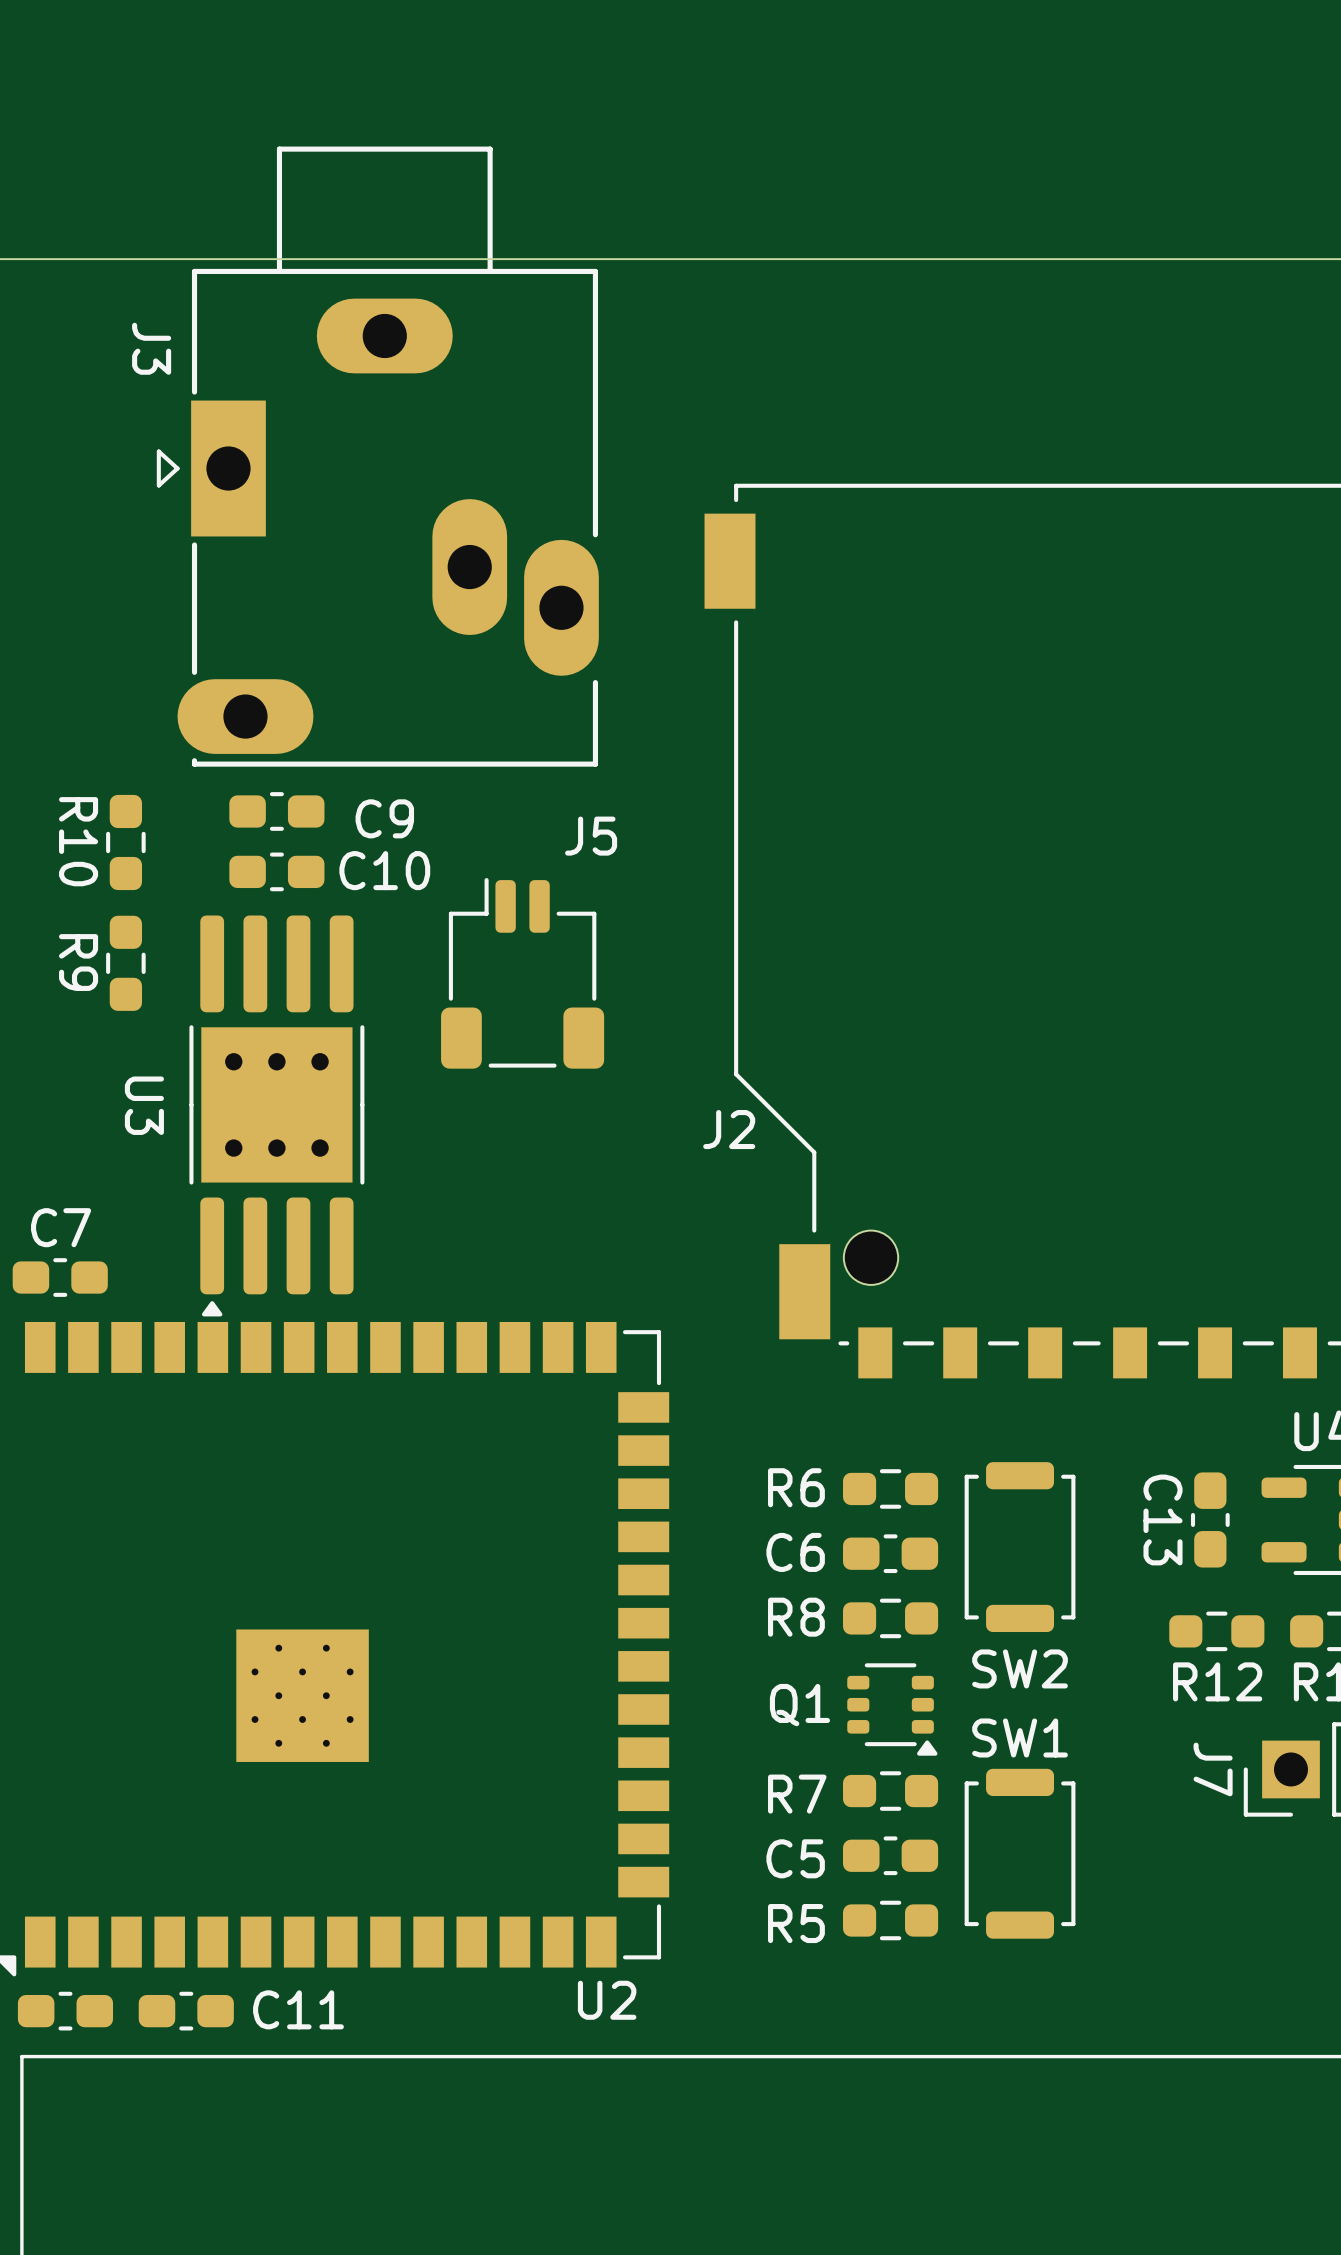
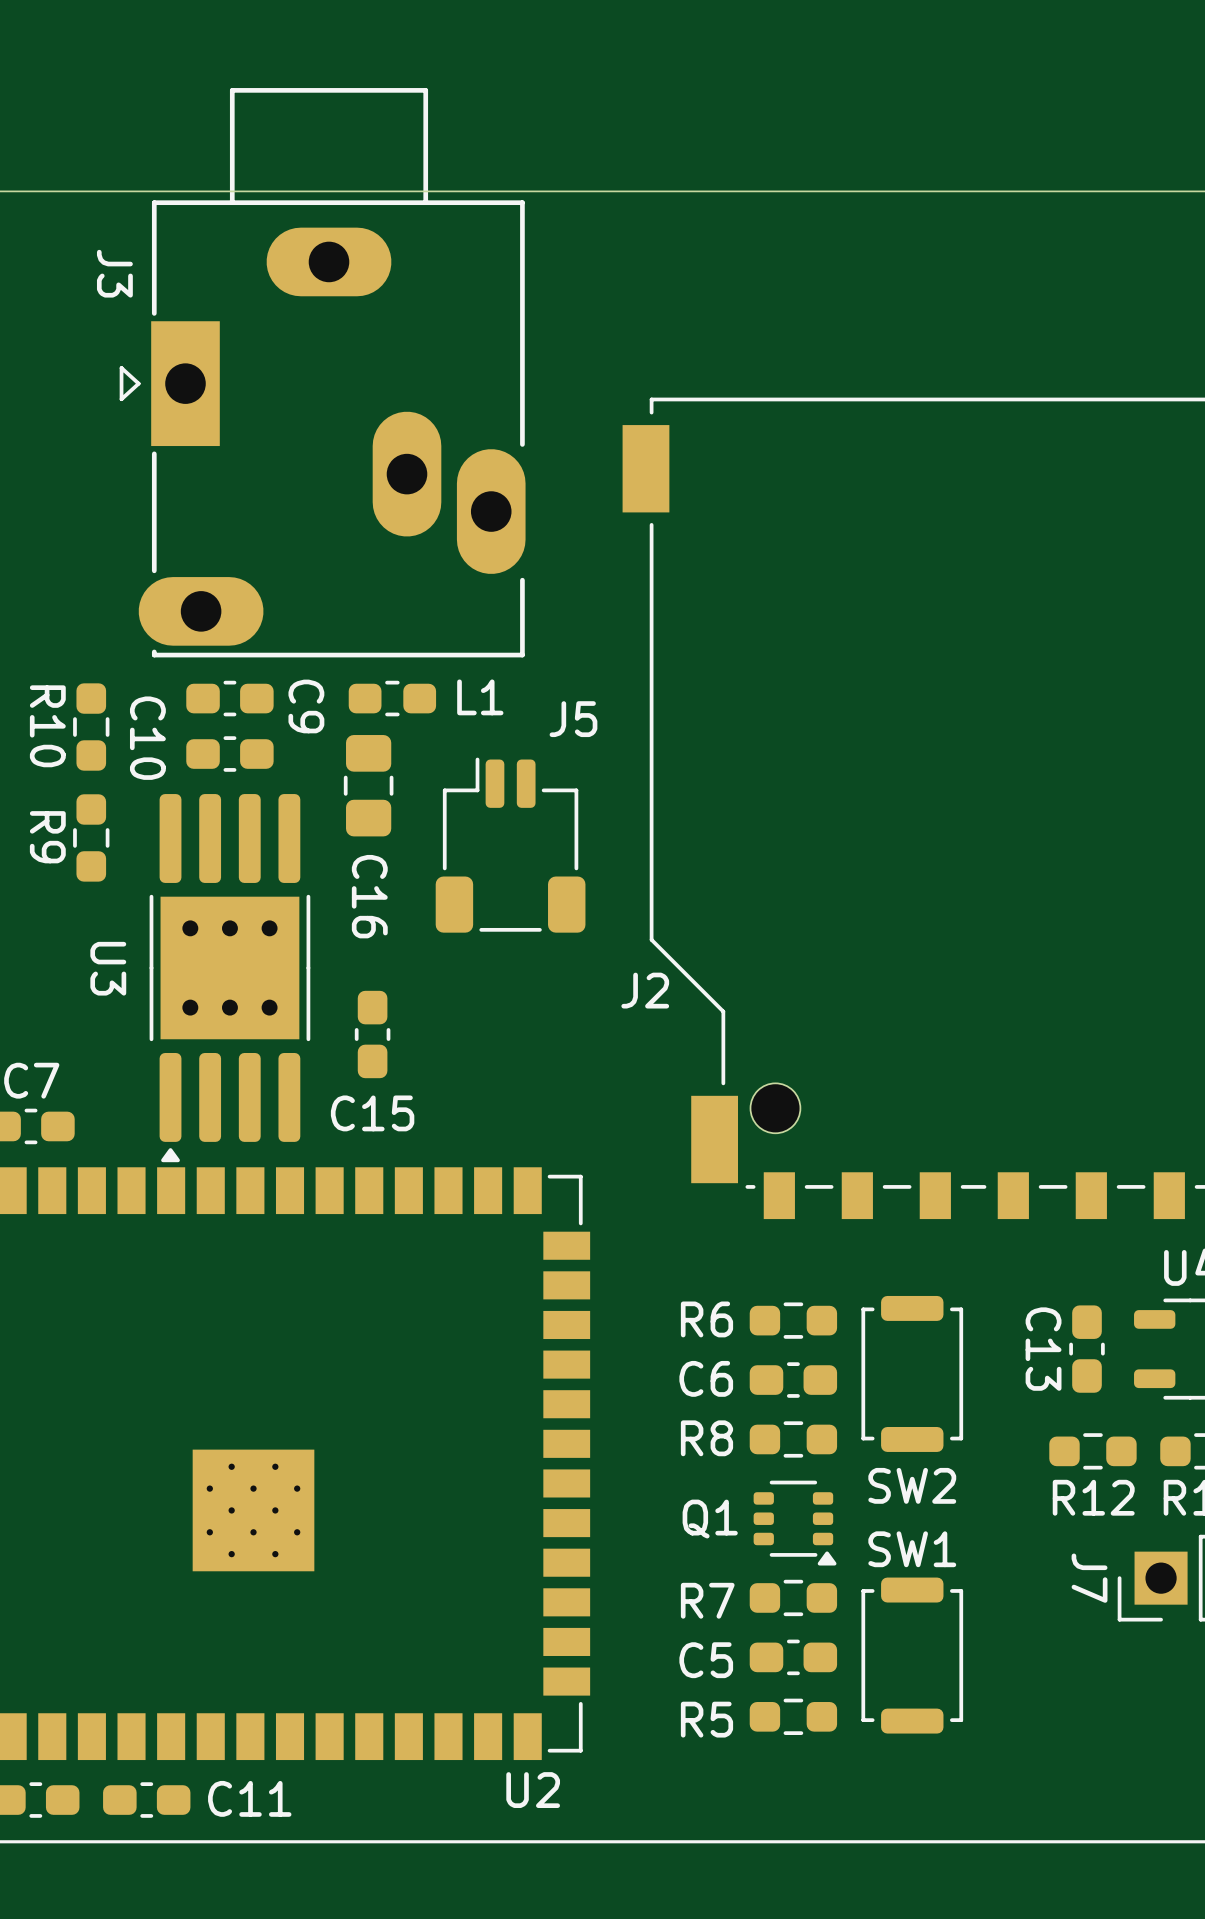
L1: none -> (392, 698)
C9 name rotation: 0° (384, 818) -> 90° clockwise (306, 706)
C10 name rotation: 0° (384, 870) -> 90° clockwise (147, 738)
C10 name position: C10 (384, 870) -> C10 (147, 738)
C16: none -> (368, 785)
J5 position: (522, 973) -> (510, 845)
C15: none -> (372, 1034)

